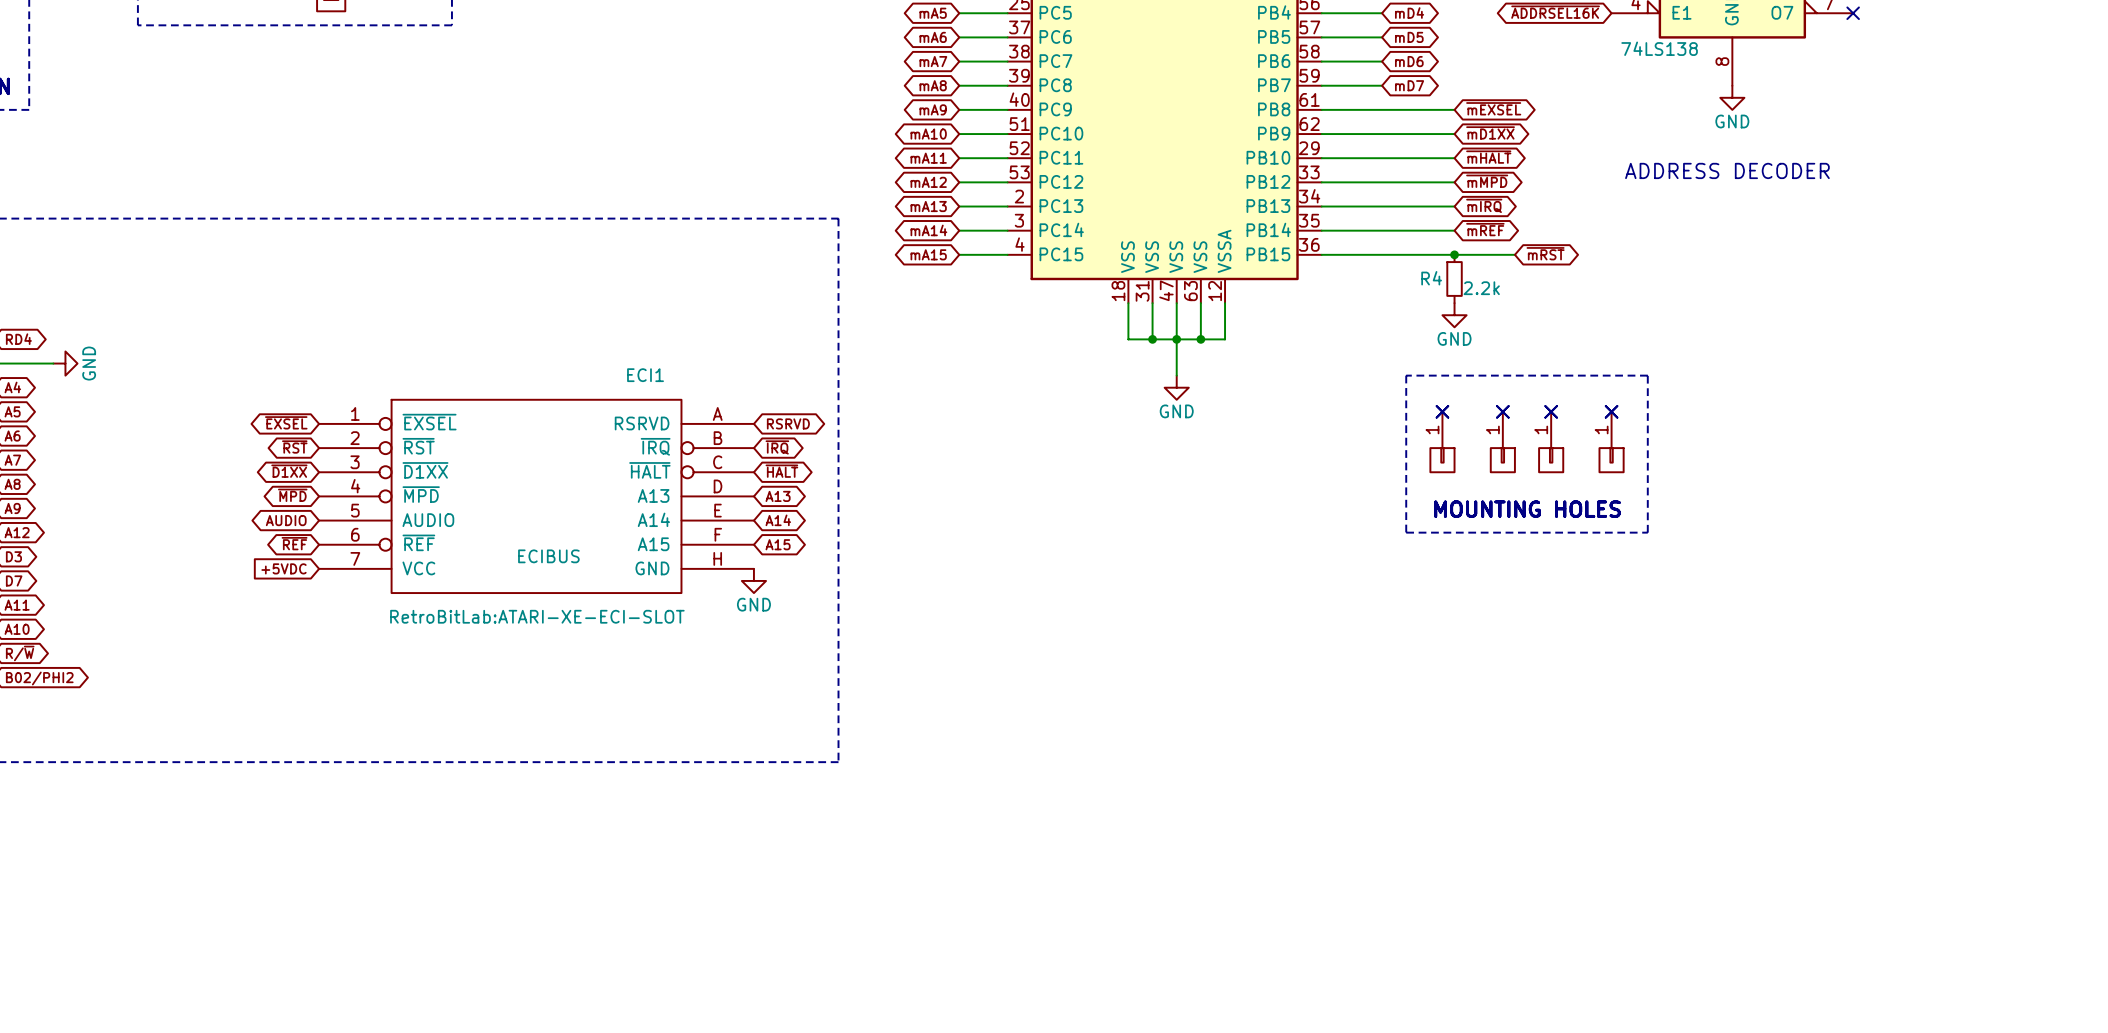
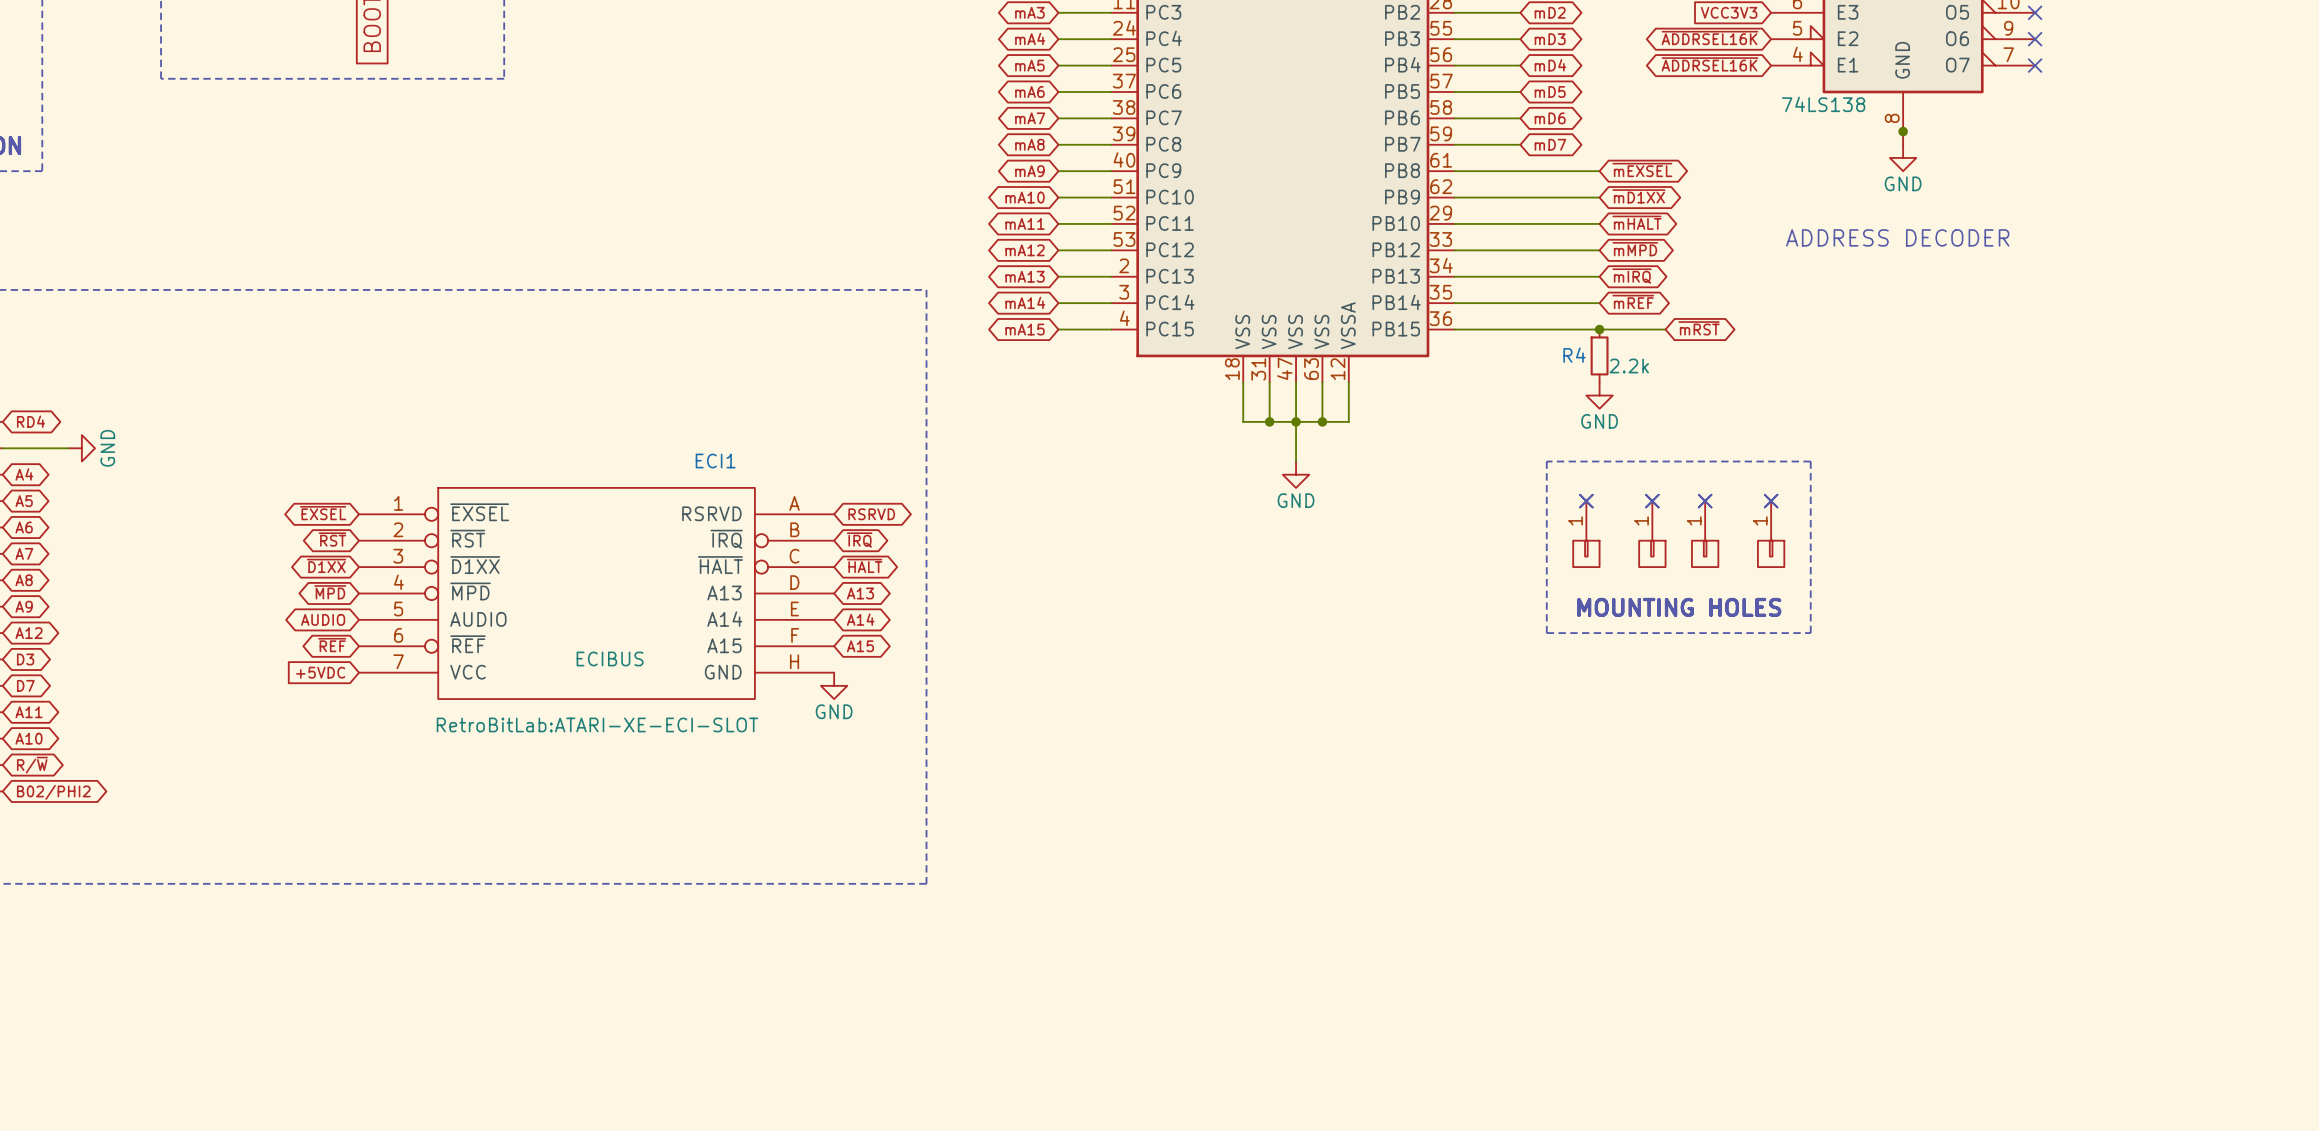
junction: none -> (1903, 131)

